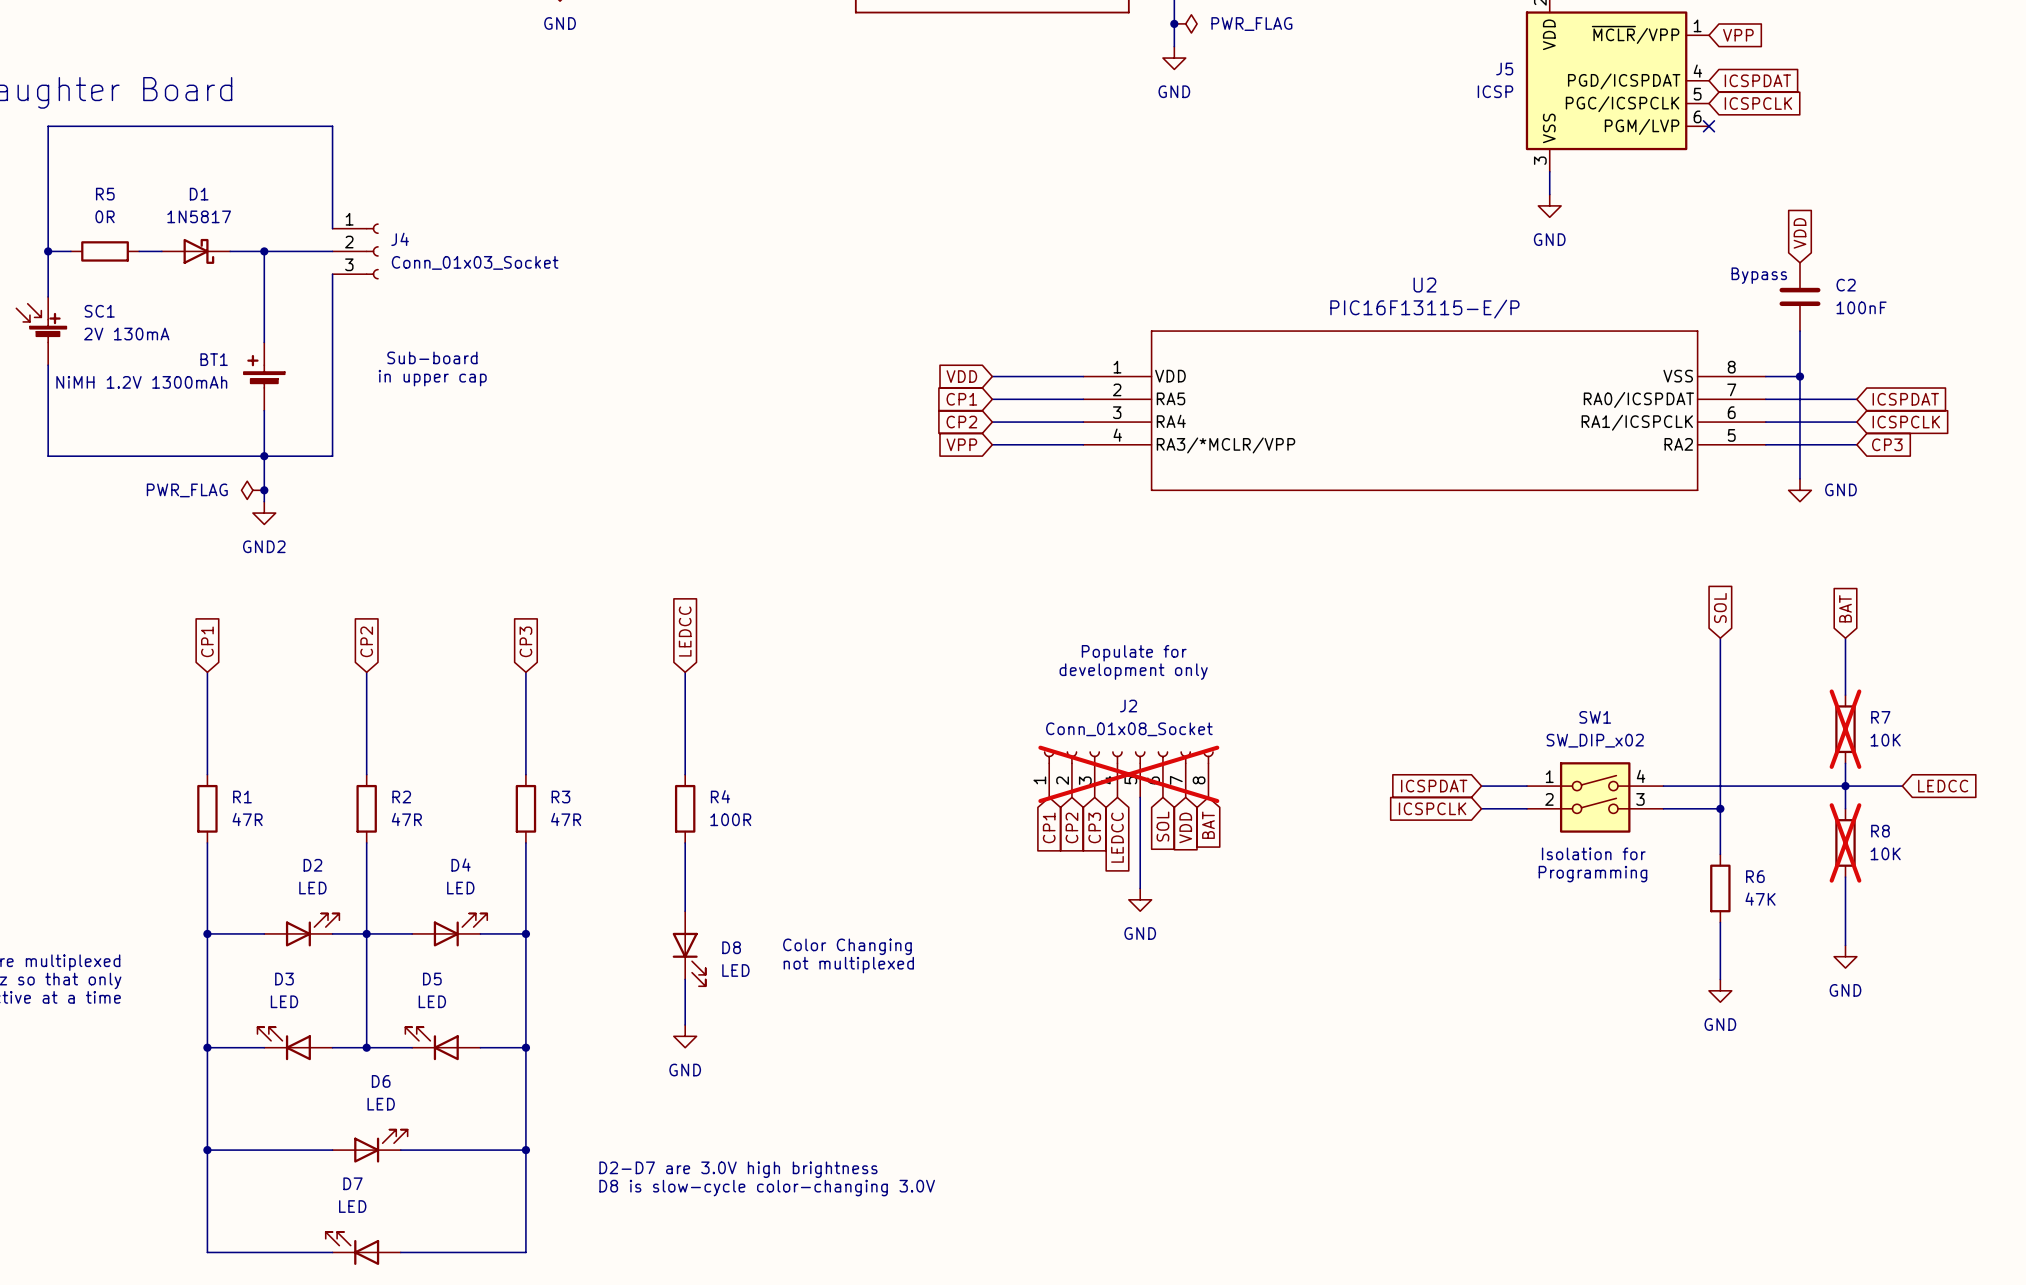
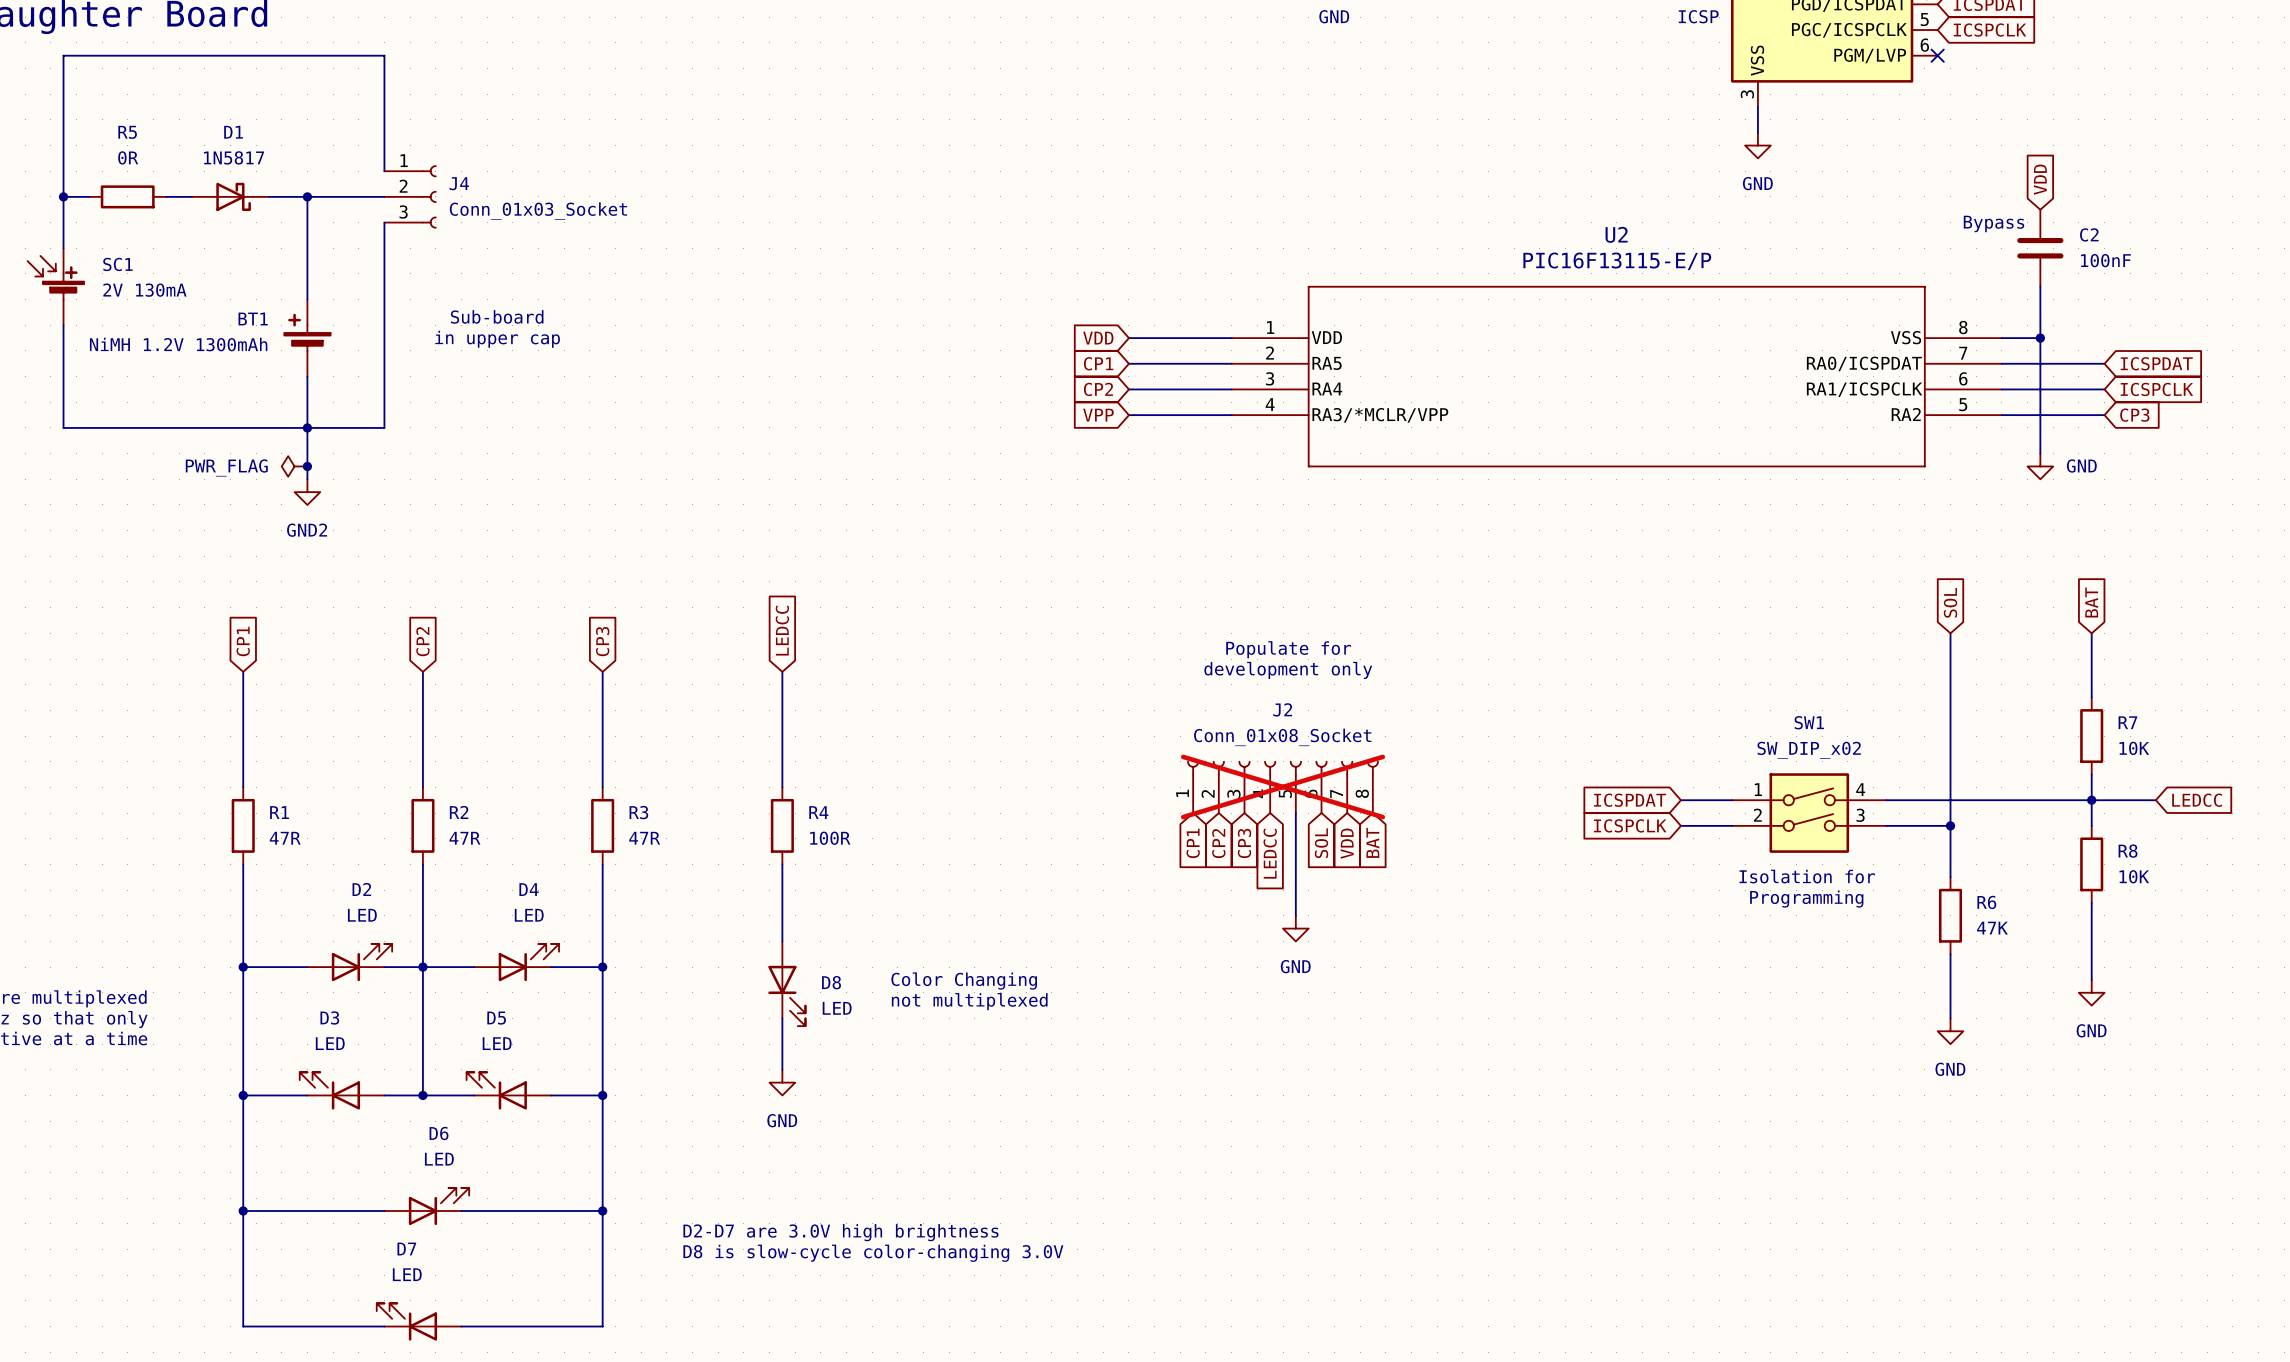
R7 do-not-place cross: (1845, 729) -> none
R8 do-not-place cross: (1845, 842) -> none

